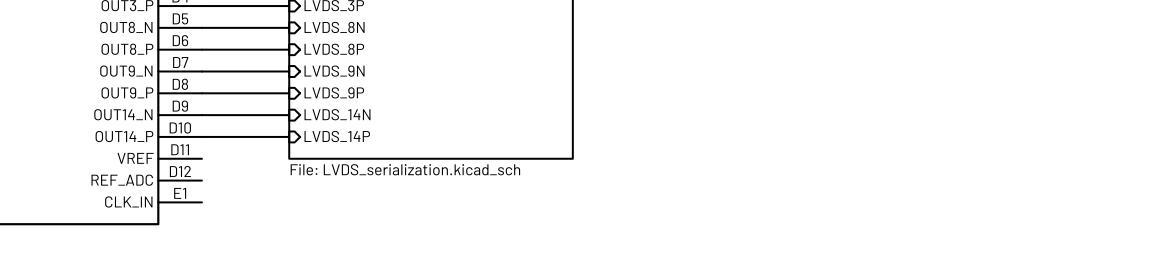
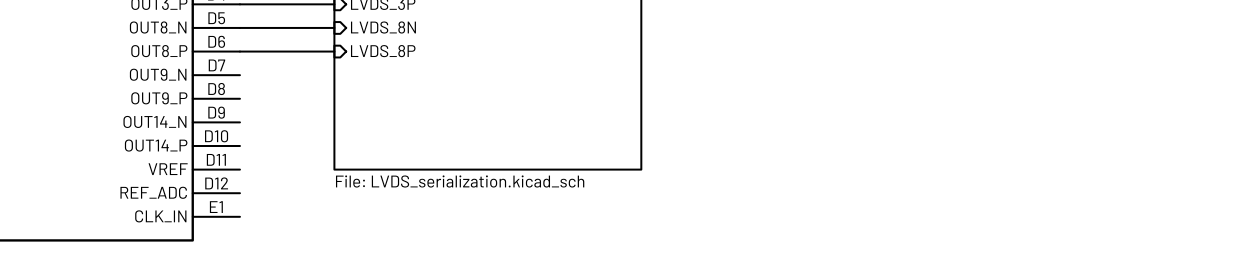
wire: (201, 71) (289, 71) -> none
sheet pin: LVDS_9N (334, 71) -> none
sheet pin: LVDS_9P (334, 92) -> none
wire: (201, 93) (289, 93) -> none
sheet pin: LVDS_14N (337, 114) -> none
wire: (201, 115) (289, 115) -> none
wire: (201, 136) (289, 136) -> none
sheet pin: LVDS_14P (337, 136) -> none

